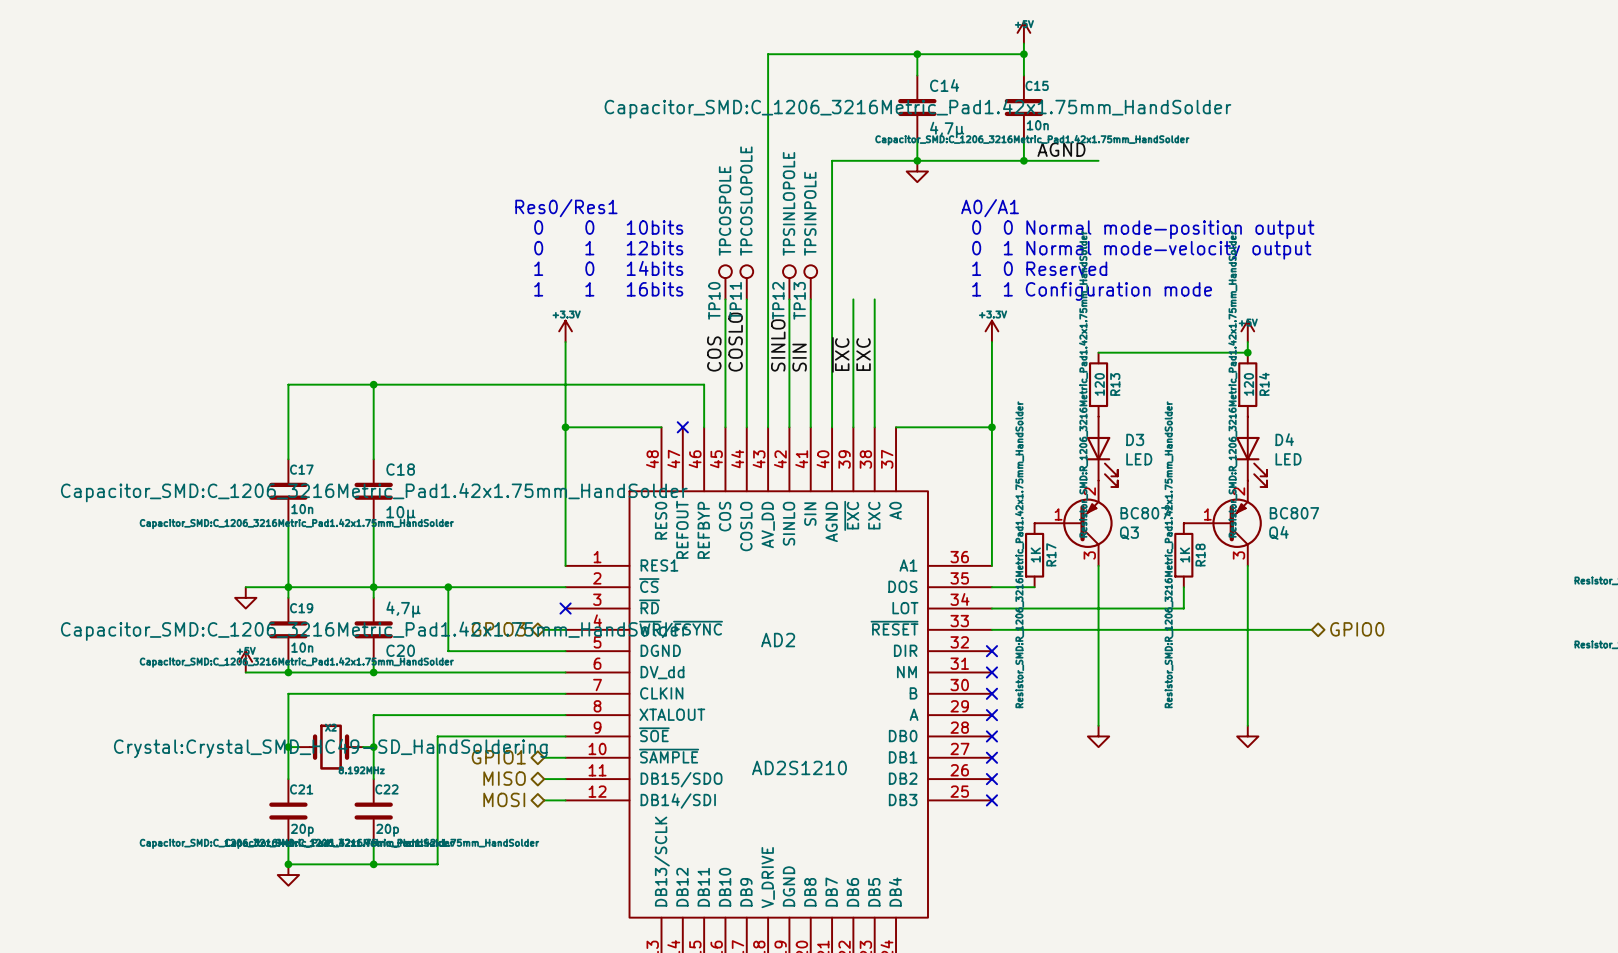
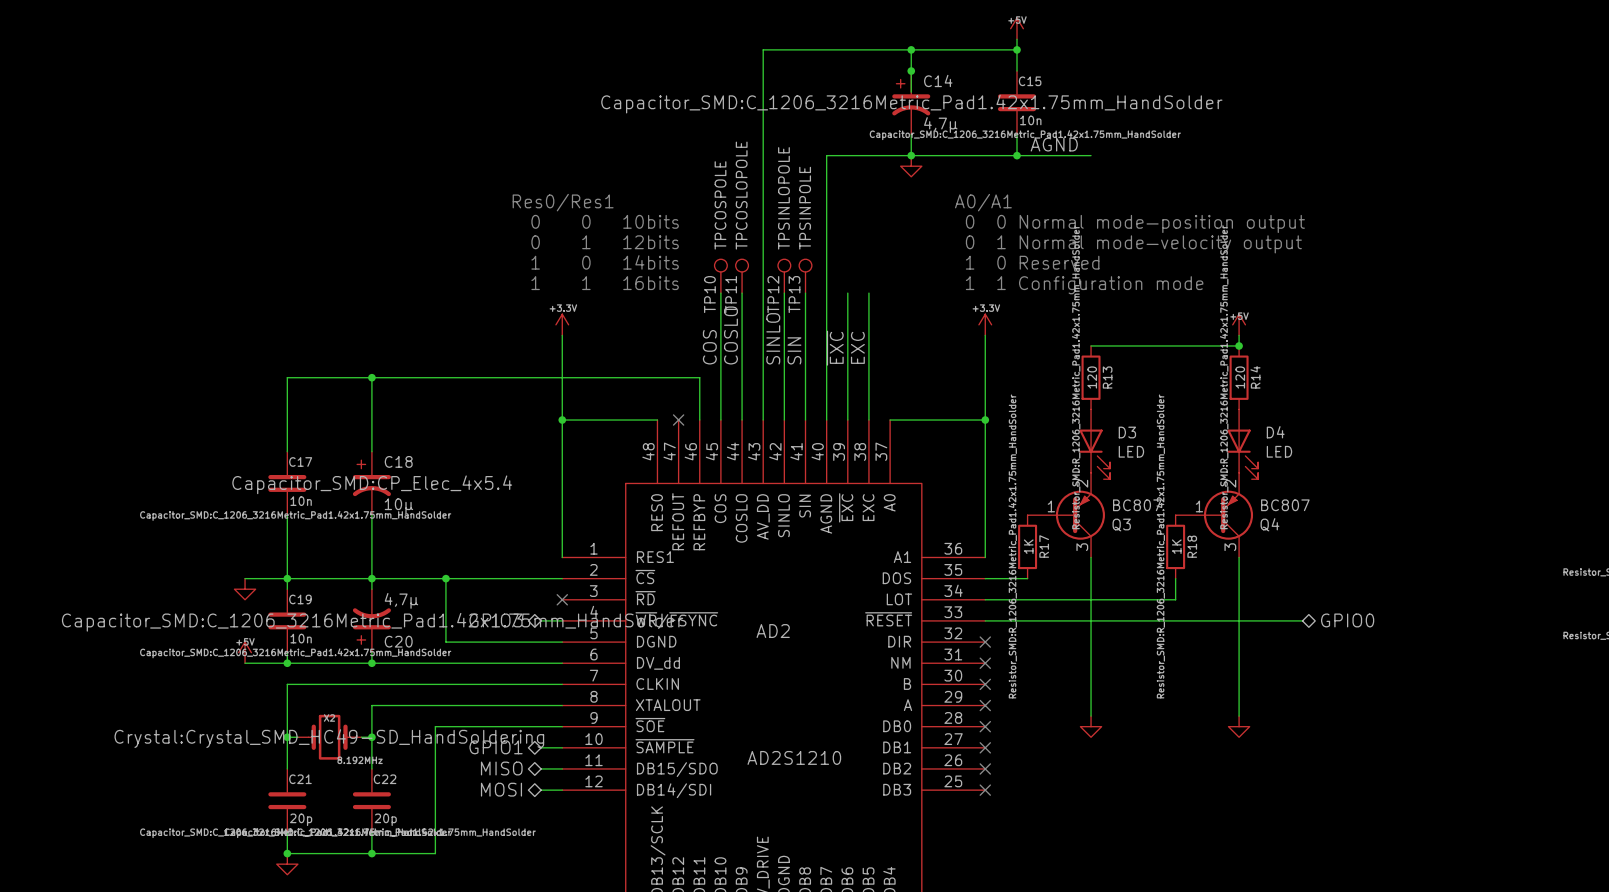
C14 symbol: [898, 75, 937, 140] -> [892, 71, 931, 135]
junction: none -> (911, 71)
C18 symbol: [354, 459, 393, 524] -> [352, 451, 391, 516]
C18 text: Capacitor_SMD:C_1206_3216Metric_Pad1.42x1.75mm_HandSolder (374, 492) -> Capacitor_SMD:CP_Elec_4x5.4 (372, 484)
C20 symbol: [354, 597, 393, 662] -> [352, 589, 391, 653]

